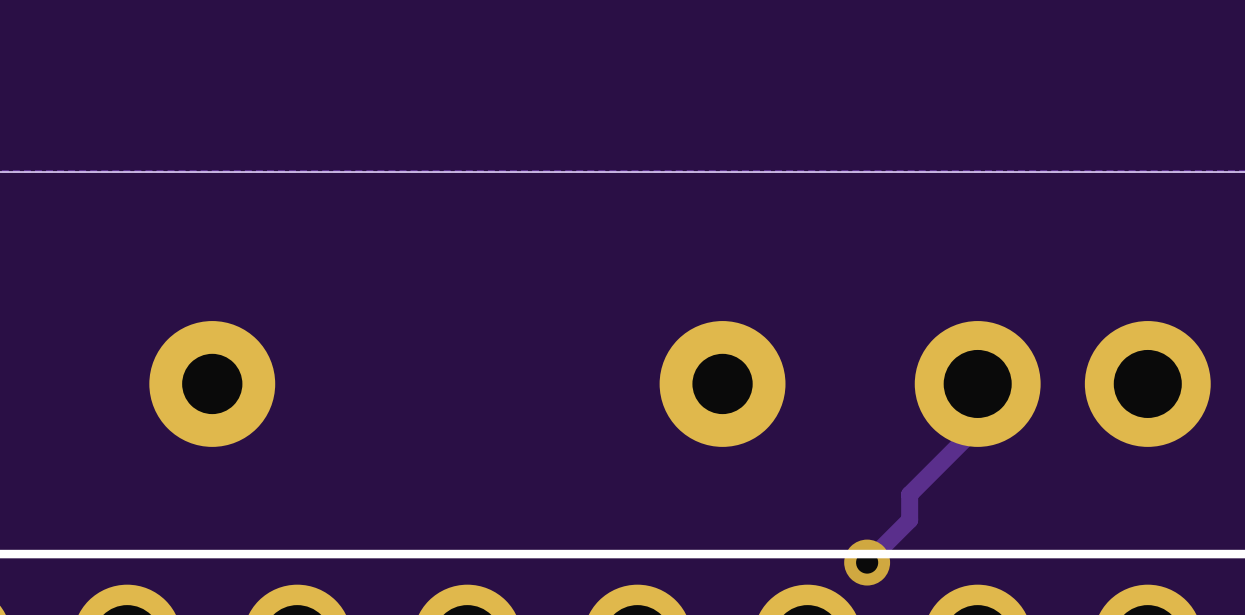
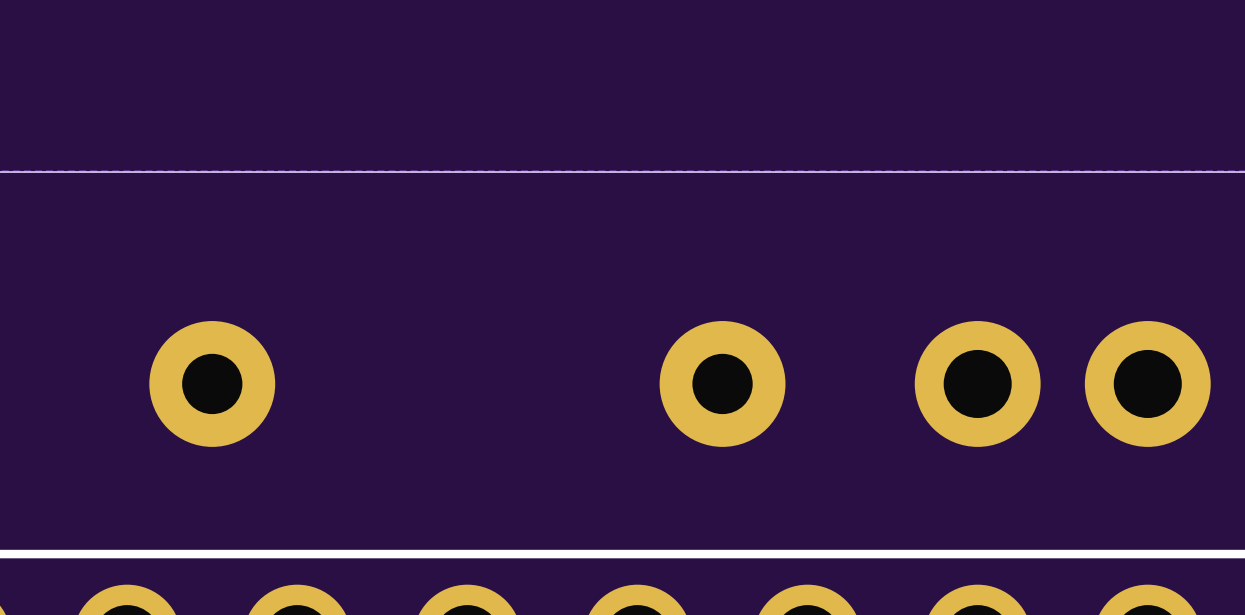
track: (977, 383) (977, 426) (909, 494) (909, 520) (867, 562) -> none
via: (867, 562) -> none

